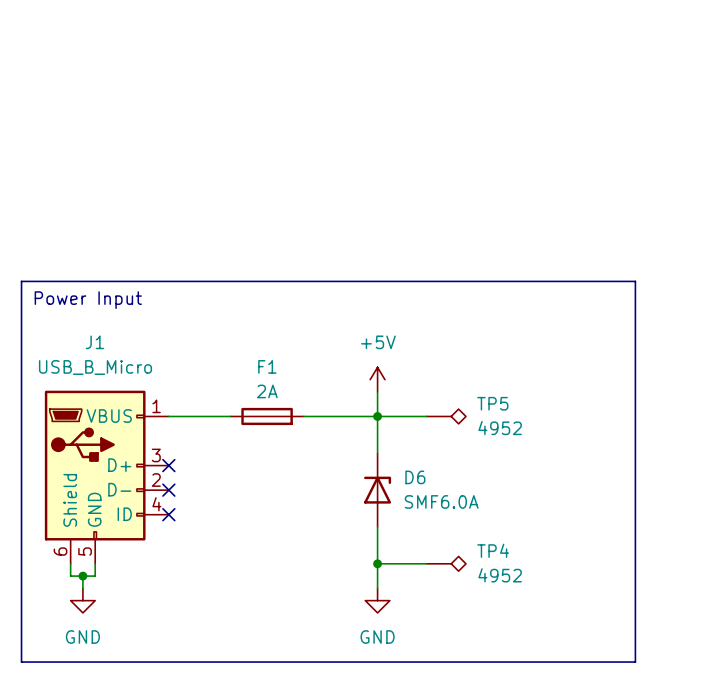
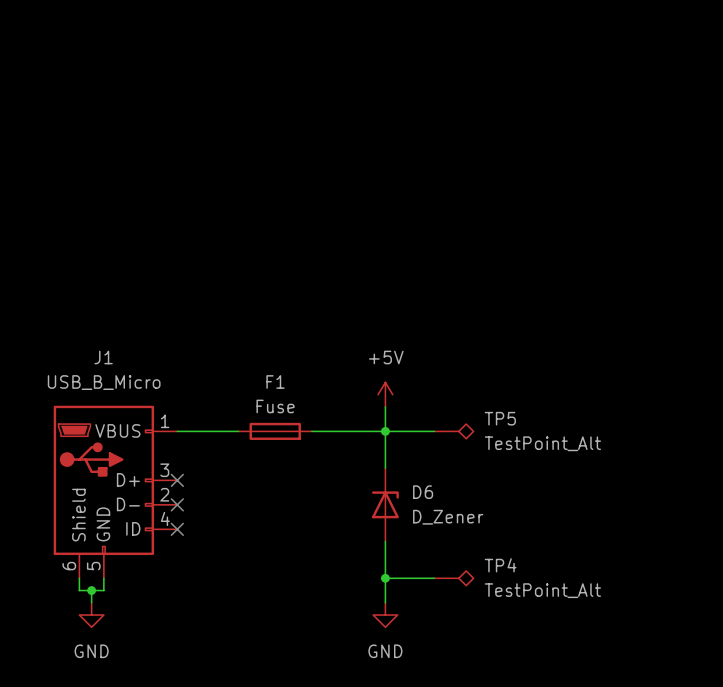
line: (21, 281) (635, 281) (635, 662) (21, 662) (21, 281) -> none
text: Power Input (88, 300) -> none
F1 value: 2A (267, 391) -> Fuse (275, 406)
TP5 value: 4952 (500, 428) -> TestPoint_Alt (542, 443)
D6 value: SMF6.0A (441, 501) -> D_Zener (448, 517)
TP4 value: 4952 (500, 575) -> TestPoint_Alt (542, 590)

